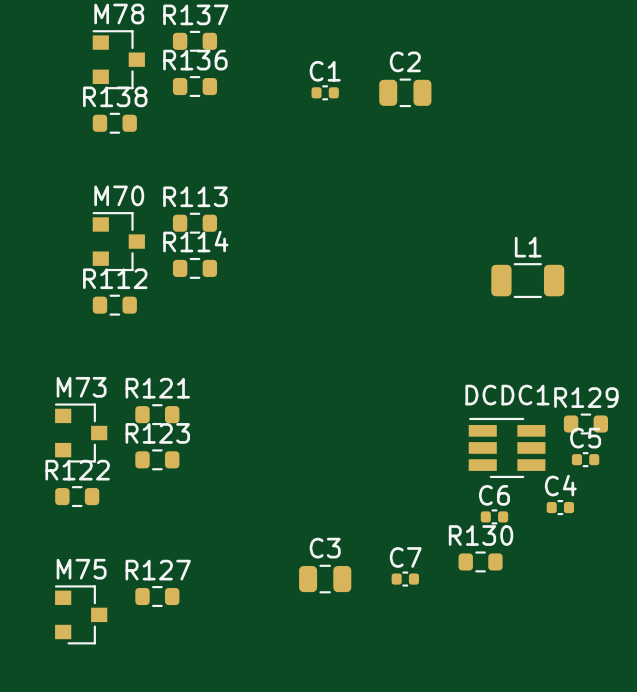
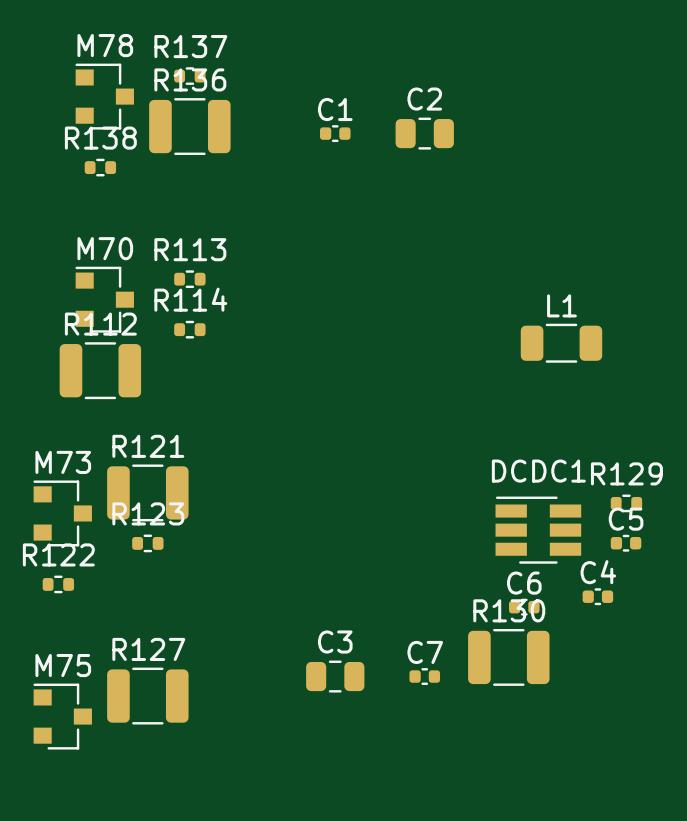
R137 footprint: [172, 30, 218, 52] -> [174, 67, 206, 85]
R136 footprint: [172, 76, 218, 98] -> [149, 98, 231, 156]
R138 footprint: [92, 112, 137, 134] -> [84, 158, 117, 177]
R113 footprint: [172, 212, 218, 234] -> [174, 270, 206, 289]
R114 footprint: [172, 257, 218, 279] -> [174, 320, 206, 339]
R112 footprint: [92, 294, 137, 316] -> [59, 342, 142, 400]
R121 footprint: [135, 404, 180, 426] -> [107, 464, 189, 522]
R129 footprint: [563, 413, 609, 435] -> [610, 494, 643, 513]
R123 footprint: [135, 449, 180, 471] -> [132, 534, 164, 553]
R122 footprint: [55, 486, 100, 508] -> [42, 575, 75, 594]
R130 footprint: [458, 551, 503, 573] -> [468, 628, 550, 686]
R127 footprint: [135, 586, 180, 608] -> [107, 667, 189, 725]

